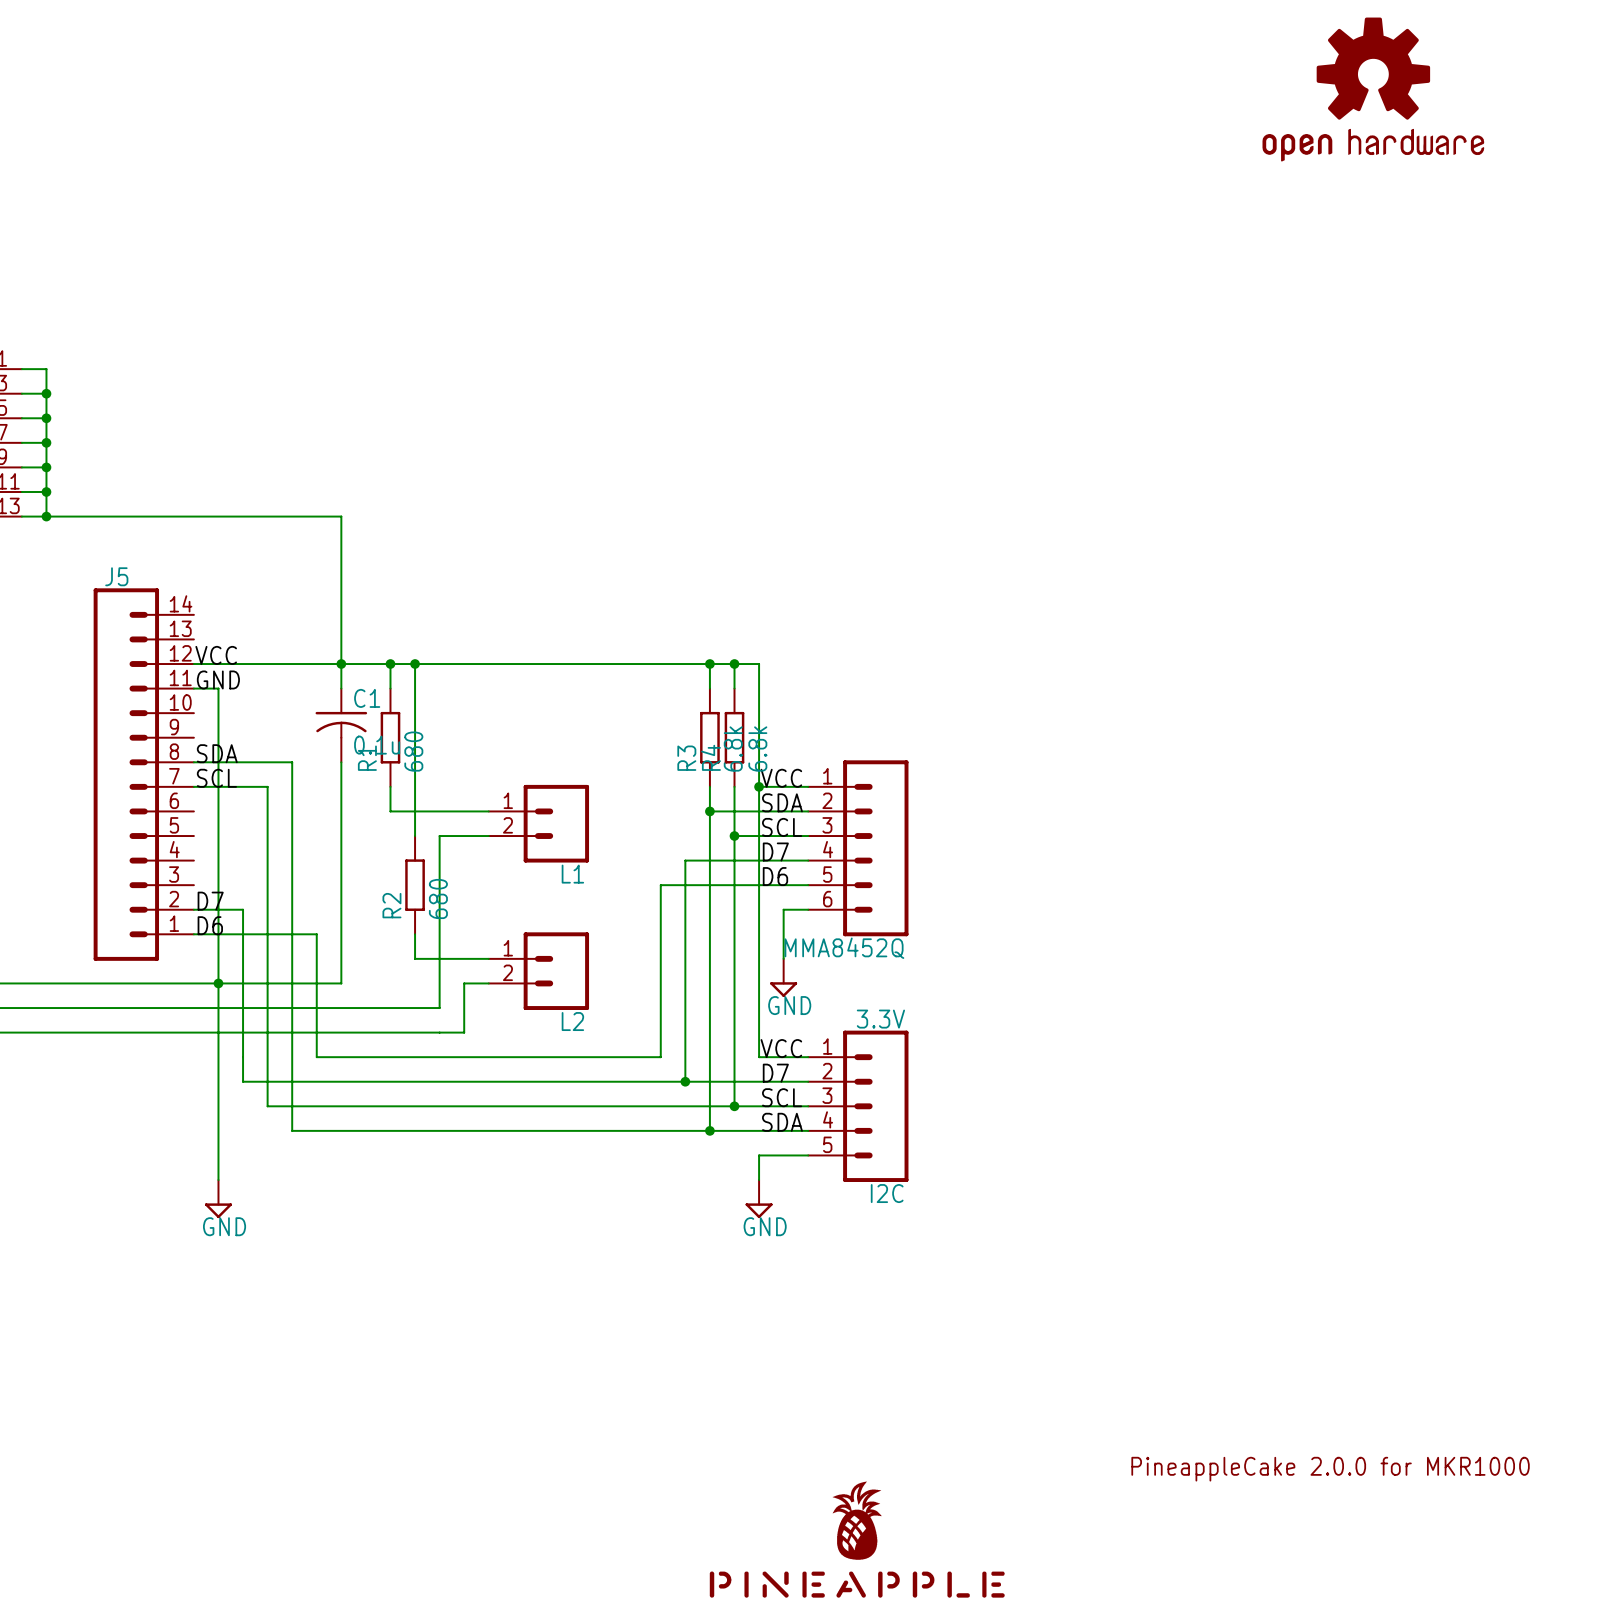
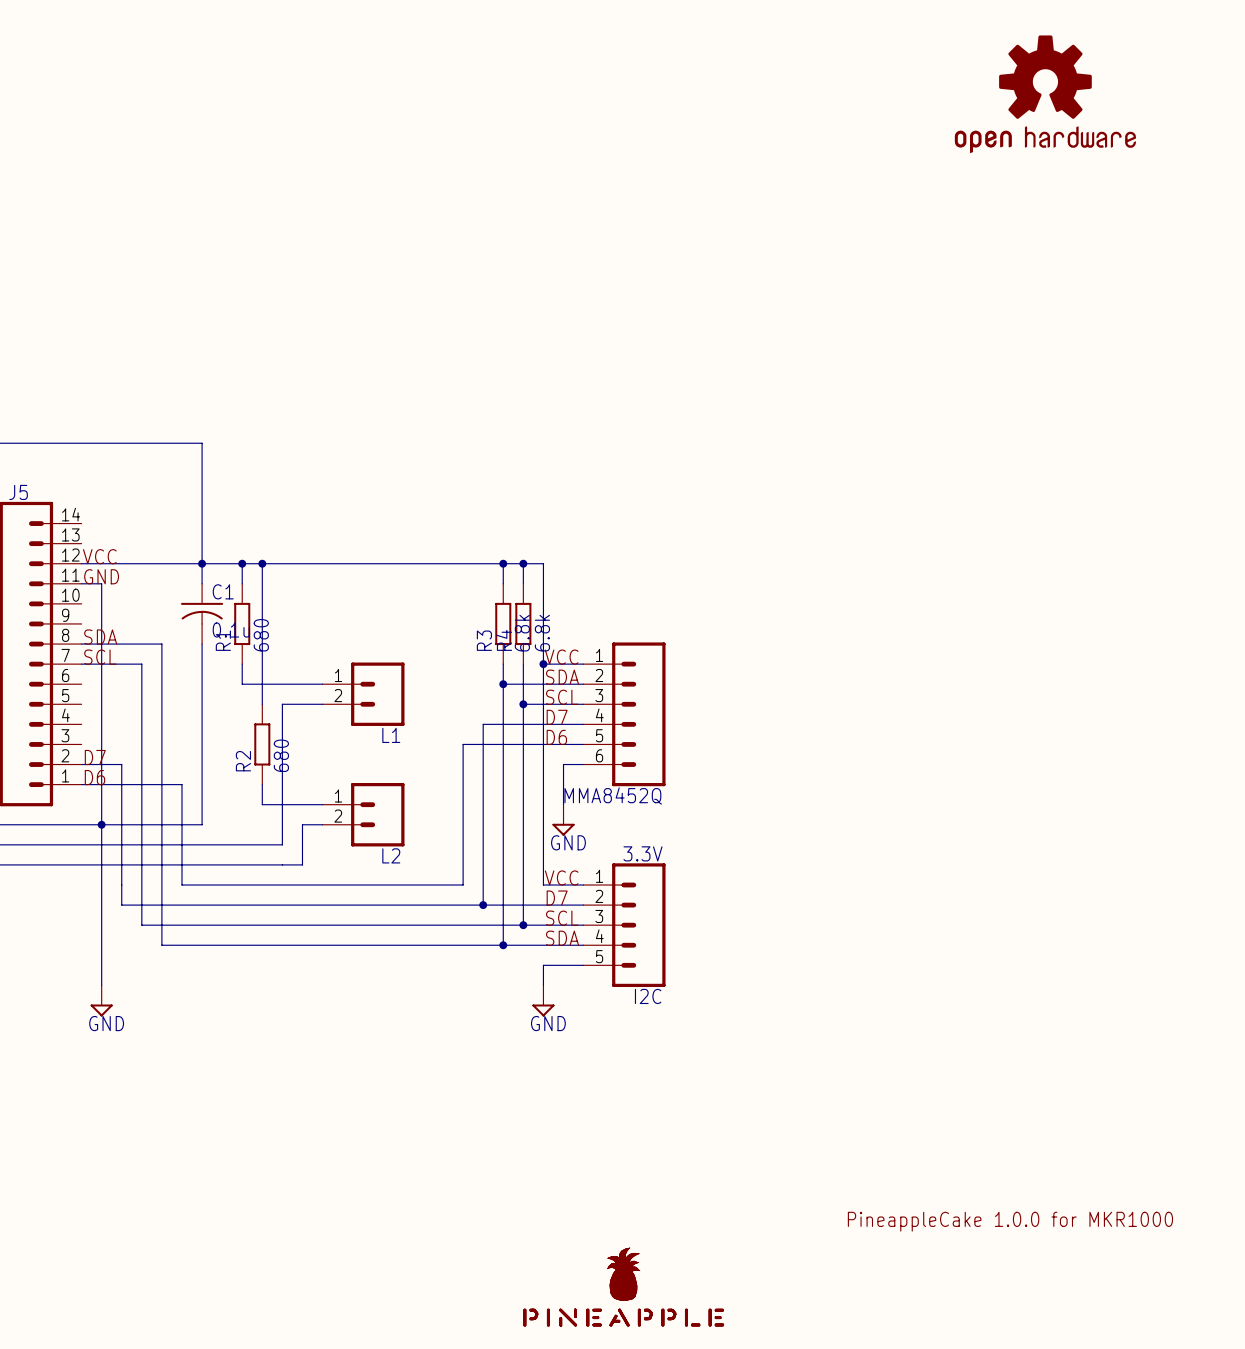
text: PineappleCake 2.0.0 for MKR1000 (1330, 1469) -> PineappleCake 1.0.0 for MKR1000 (1010, 1221)
part: (857, 1539) -> none
part: none -> (623, 1287)

